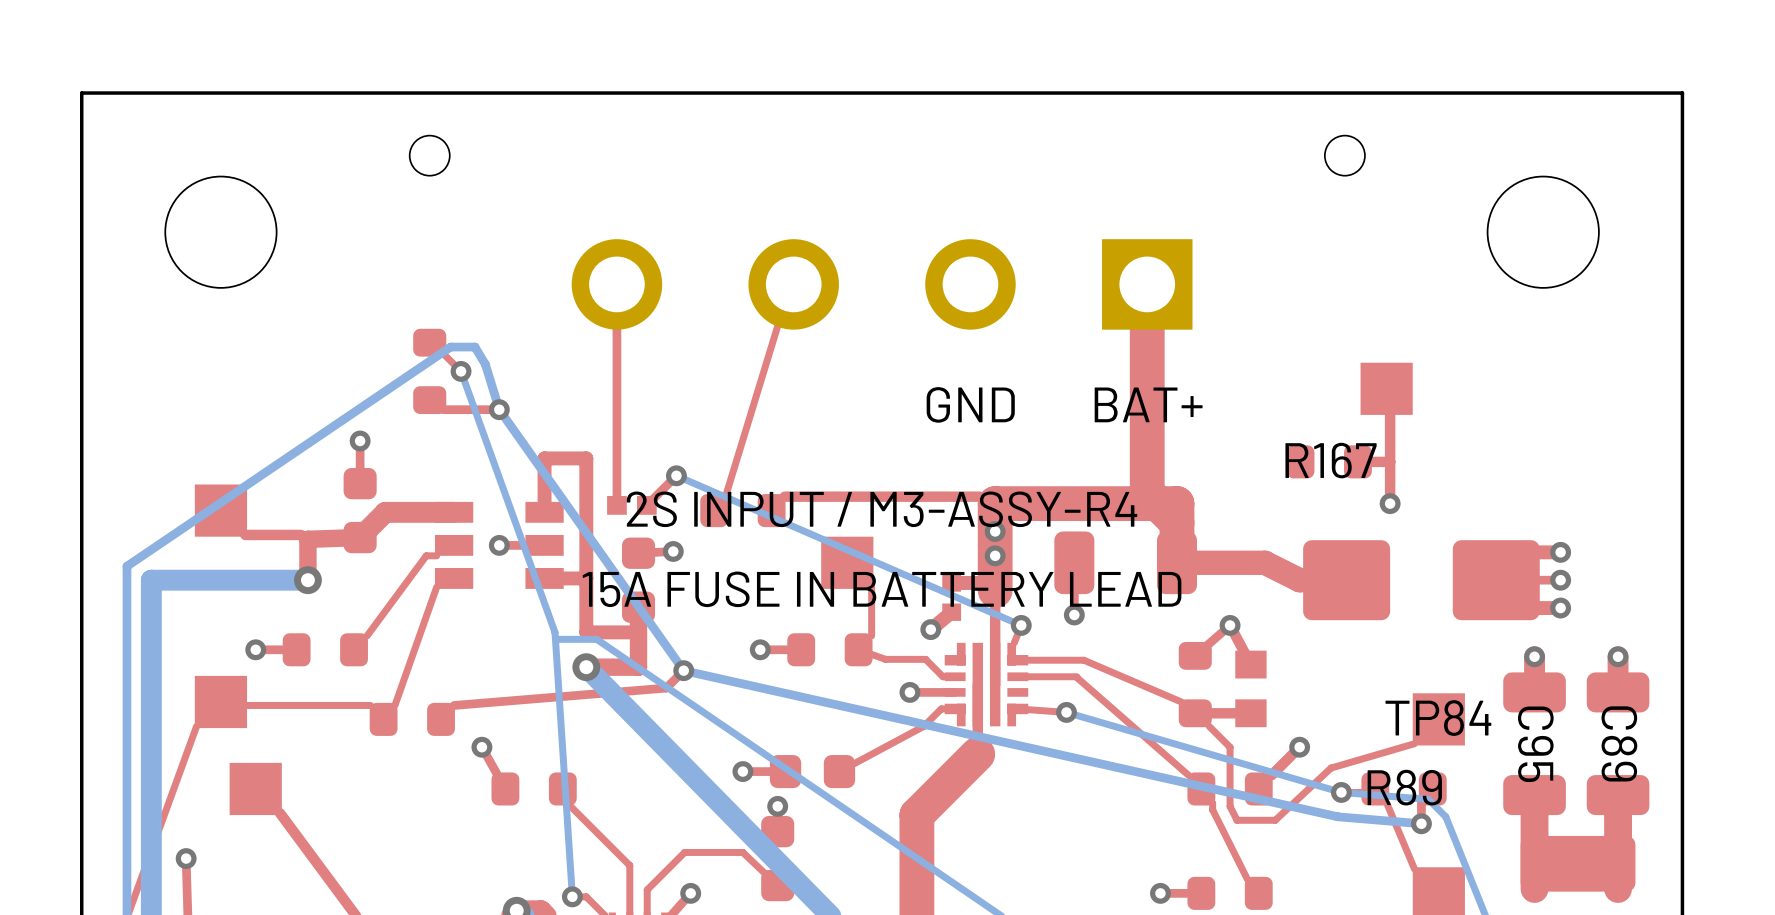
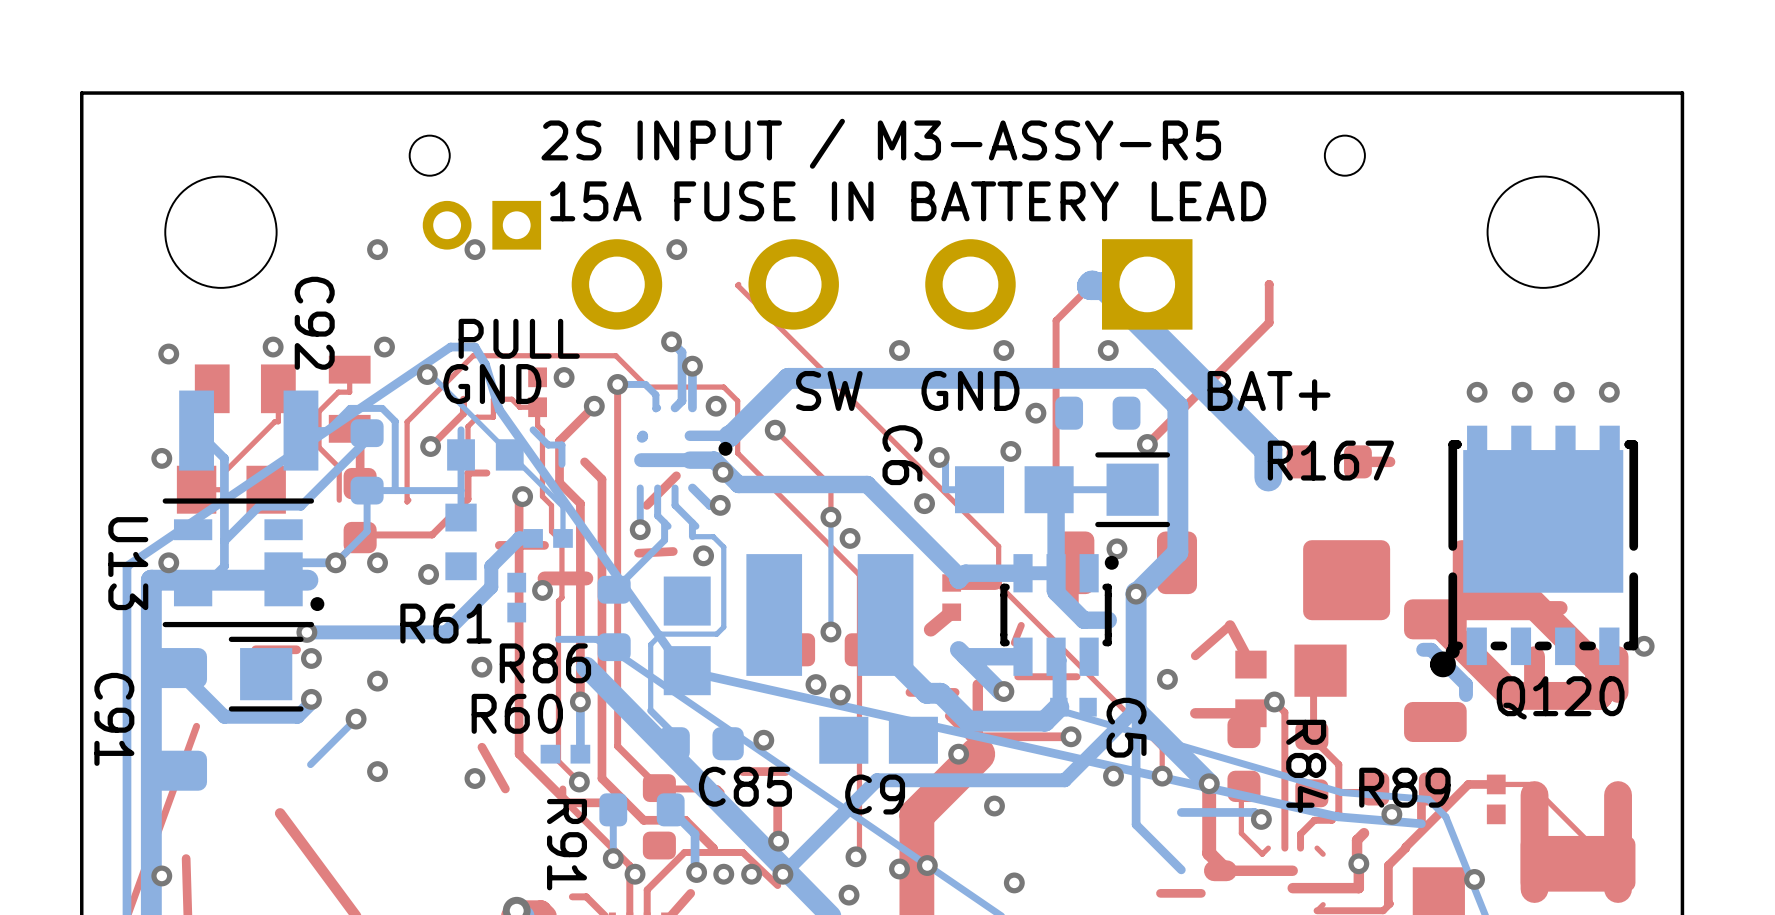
text: none -> 2S INPUT / M3-ASSY-R5 (881, 143)
part: none -> (481, 225)
via: none -> (377, 249)
via: none -> (474, 249)
via: none -> (676, 249)
top track: (616, 284) (616, 505) -> none
top track: none -> (738, 284) (998, 546) (998, 584) (1162, 748) (1162, 776)
top track: none -> (1092, 284) (1056, 320) (1056, 552)
bottom track: none -> (1092, 284) (1090, 286) (1104, 286) (1268, 449) (1268, 477)
top track: (1147, 284) (1147, 493) (1177, 522) -> none
top track: none -> (1269, 284) (1269, 322) (1147, 444)
top track: (777, 326) (725, 496) -> none
text: none -> PULL (519, 338)
bottom track: none -> (671, 341) (682, 352) (682, 400) (675, 407)
via: none -> (671, 341)
via: none -> (273, 347)
via: none -> (384, 347)
via: none -> (899, 350)
via: none -> (1003, 350)
via: none -> (1108, 350)
via: none -> (168, 354)
top track: (443, 354) (461, 371) -> none
bottom track: none -> (692, 366) (692, 407)
via: none -> (692, 366)
top track: none -> (349, 369) (349, 392) (338, 392) (319, 411) (319, 447) (339, 467) (339, 500)
R91 side: top (429, 371) -> bottom (641, 809)
bottom track: (461, 371) (554, 632) (572, 896) -> none
via position: (461, 371) -> (427, 374)
bottom track: none -> (427, 374) (430, 374) (563, 506) (563, 538)
via: none -> (564, 377)
text: none -> GND (492, 384)
top track: none -> (617, 384) (617, 746) (658, 788) (717, 788) (721, 792)
bottom track: none -> (617, 384) (645, 384) (655, 394) (655, 408) (657, 407)
via: none -> (617, 384)
part: none -> (245, 388)
top track: none -> (278, 388) (278, 421) (274, 421) (224, 471) (224, 489) (196, 489)
part: (1386, 388) -> none
text: none -> SW (829, 390)
via: none -> (1477, 392)
via: none -> (1522, 392)
via: none -> (1564, 392)
via: none -> (1609, 392)
part: none -> (349, 399)
top track: none -> (463, 399) (463, 413) (430, 446)
text position: GND (970, 404) -> GND (970, 390)
text position: BAT+ (1148, 404) -> BAT+ (1269, 390)
top track: none -> (594, 406) (559, 441) (559, 482) (580, 503) (580, 701)
via: none -> (594, 406)
via: none -> (716, 406)
top track: none -> (519, 407) (511, 399) (493, 399) (493, 417) (477, 417) (468, 426) (468, 443)
top track: none -> (519, 407) (537, 407) (537, 425) (542, 430) (542, 496) (551, 505) (551, 531) (561, 541) (561, 597) (558, 601) (558, 761) (579, 782)
top track: (499, 409) (443, 409) -> none
via: (499, 409) -> none
via: none -> (1035, 413)
top track: (1390, 413) (1390, 503) -> none
bottom track: none -> (461, 429) (461, 517)
bottom track: none -> (533, 429) (548, 445) (561, 445) (561, 464)
bottom track: none -> (196, 430) (224, 458) (224, 566) (193, 597)
C92: none -> (248, 430)
bottom track: none -> (300, 430) (327, 430) (349, 408) (382, 408) (395, 421) (395, 490)
top track: none -> (775, 430) (830, 485) (830, 517)
via: none -> (775, 430)
bottom track: none -> (367, 433) (367, 440) (300, 506) (259, 506) (224, 541)
bottom track: none -> (642, 435) (641, 437)
bottom track: none -> (689, 435) (729, 436) (788, 378) (1150, 378) (1177, 406) (1177, 552) (1136, 594)
via: (360, 441) -> none
drawing: none -> [718, 441, 733, 456]
via: none -> (1147, 444)
via: none -> (430, 446)
via: none -> (1010, 451)
part: none -> (485, 454)
bottom track: none -> (939, 457) (945, 463) (945, 489) (979, 489)
via: none -> (939, 457)
via: none -> (161, 458)
bottom track: none -> (714, 460) (738, 484) (867, 484) (957, 574) (958, 580) (965, 573) (1056, 573)
bottom track: none -> (714, 460) (641, 460)
part: none -> (367, 461)
top track: none -> (584, 461) (601, 479) (601, 778) (643, 820) (685, 820) (712, 849)
via: none -> (723, 472)
top track: none -> (486, 473) (468, 473) (468, 499) (432, 534) (363, 534) (335, 562)
bottom track: (676, 475) (1021, 625) -> none
via: (676, 475) -> none
part footprint: [194, 484, 248, 537] -> [176, 465, 286, 514]
bottom track: none -> (640, 487) (640, 529)
bottom track: none -> (657, 487) (657, 515) (668, 526)
bottom track: none -> (675, 487) (675, 505) (695, 526)
bottom track: none -> (692, 487) (709, 505) (720, 505)
C6: none -> (1014, 489)
bottom track: none -> (1132, 489) (1049, 489) (1056, 496) (1056, 592) (1083, 620) (1108, 620)
part: none -> (1132, 489)
bottom track: none -> (461, 490) (367, 490) (367, 531) (335, 562) (283, 562)
top track: none -> (522, 496) (519, 500) (519, 754) (567, 802) (624, 801)
via: none -> (522, 496)
top track: (979, 496) (784, 496) -> none
top track: none -> (408, 500) (407, 501) (407, 421) (473, 355) (615, 355) (647, 387) (723, 387) (737, 400) (737, 453) (859, 574) (859, 853) (855, 856)
via: none -> (924, 503)
via: (1390, 503) -> none
part rotation: 0° (631, 505) -> 90° clockwise (537, 392)
part position: (631, 505) -> (537, 392)
via: none -> (720, 505)
text: 2S INPUT / M3-ASSY-R4 (881, 509) -> none
part side: top (742, 510) -> bottom (1097, 413)
top track: (454, 512) (385, 512) (360, 537) (307, 539) (307, 580) -> none
top track: (544, 512) (544, 458) (586, 458) (586, 632) (638, 632) -> none
bottom track: none -> (830, 517) (830, 632)
via: none -> (830, 517)
bottom track: none -> (664, 522) (664, 540) (614, 589)
bottom track: none -> (692, 522) (692, 536) (713, 536) (723, 547) (723, 627) (716, 634) (661, 634) (650, 644) (650, 710) (675, 735) (675, 745) (674, 743)
via: none -> (640, 529)
via: (995, 531) -> none
top track: (300, 534) (245, 534) -> none
bottom track: none -> (533, 538) (519, 538) (491, 566) (491, 587) (446, 632) (306, 632)
part: none -> (548, 538)
via: none -> (850, 538)
part: none -> (461, 541)
part: (499, 545) -> none
via: (499, 545) -> none
via: none -> (1116, 548)
top track: none -> (1477, 548) (1598, 669) (1598, 695) (1511, 695) (1435, 619)
via: (673, 551) -> none
Q120: none -> (1534, 551)
via: (1560, 552) -> none
top track: (436, 555) (426, 555) (367, 635) -> none
via: none -> (703, 555)
via: (995, 555) -> none
via: none -> (168, 562)
U13: none -> (238, 562)
via: none -> (335, 562)
via: none -> (377, 562)
part: (847, 562) -> none
via: none -> (428, 574)
via: (307, 580) -> none
part: (638, 580) -> none
top track: (1346, 580) (1299, 580) (1264, 562) (1177, 562) (1177, 503) (995, 503) (995, 684) -> none
via: (1560, 580) -> none
top track: (436, 587) (394, 705) -> none
text position: 15A FUSE IN BATTERY LEAD (881, 589) -> 15A FUSE IN BATTERY LEAD (908, 201)
via: none -> (542, 590)
bottom track: none -> (1136, 592) (1136, 710) (1209, 783)
bottom track: none -> (1136, 594) (1136, 824) (1181, 869)
bottom track: none -> (1136, 594) (1137, 595) (1137, 707) (1064, 780) (876, 780) (782, 874)
via: none -> (1136, 594)
drawing: none -> [310, 597, 325, 612]
R61: none -> (516, 597)
top track: (638, 607) (638, 667) (586, 667) -> none
via: (1560, 608) -> none
part: none -> (829, 614)
bottom track: none -> (885, 614) (884, 651) (926, 693) (940, 693) (968, 721) (1044, 721) (1059, 705) (1059, 660) (1056, 656)
part: none -> (1059, 614)
via: (1074, 614) -> none
via: (1021, 625) -> none
via: (1230, 625) -> none
via: (930, 629) -> none
via: none -> (306, 632)
via: none -> (830, 632)
part: none -> (687, 635)
via: (255, 649) -> none
part: (325, 649) -> none
via: (760, 649) -> none
top track: (858, 649) (885, 659) (925, 659) (942, 676) (955, 676) -> none
bottom track: none -> (958, 649) (1000, 691) (1003, 691)
bottom track: none -> (1423, 649) (1431, 649) (1465, 684) (1465, 695)
bottom track: none -> (1023, 656) (965, 656)
via: (1534, 656) -> none
via position: (1618, 656) -> (1644, 646)
via: none -> (311, 658)
top track: (1017, 660) (1083, 660) (1181, 701) -> none
via: none -> (481, 667)
via: (586, 667) -> none
bottom track: none -> (175, 668) (224, 716) (297, 716) (311, 702) (311, 699)
top track: (683, 670) (666, 688) (454, 705) -> none
via: (683, 670) -> none
top track: none -> (1320, 670) (1313, 677) (1313, 736) (1310, 736) (1338, 764) (1338, 813) (1331, 820) (1314, 820) (1300, 834) (1300, 848)
part: none -> (1320, 670)
part: none -> (1435, 670)
part: none -> (266, 674)
top track: (1076, 677) (1188, 775) -> none
via: none -> (1167, 679)
via: none -> (377, 681)
via: none -> (815, 684)
part: (986, 684) -> none
part: (1195, 684) -> none
via: none -> (1003, 691)
via: (909, 692) -> none
via: none -> (840, 695)
via: none -> (311, 699)
part: (220, 701) -> none
bottom track: none -> (580, 701) (580, 754)
via: none -> (580, 701)
via: none -> (1274, 701)
top track: none -> (1275, 701) (1284, 712) (1284, 848)
top track: (370, 705) (245, 705) -> none
C5: none -> (1073, 707)
top track: (955, 708) (941, 708) (923, 726) (839, 771) -> none
top track: (1017, 708) (1066, 712) -> none
via position: (1066, 712) -> (1071, 736)
top track: none -> (949, 715) (970, 736) (1071, 736)
C91: none -> (175, 719)
bottom track: none -> (356, 719) (310, 764)
via: none -> (356, 719)
part: (412, 719) -> none
TP84: (1438, 719) -> none
top track: (1209, 726) (1230, 747) (1230, 806) (1237, 820) (1275, 820) (1330, 768) (1414, 743) -> none
via: none -> (763, 740)
C9: none -> (878, 740)
C95: (1534, 743) -> none
C89: (1618, 743) -> none
via position: (481, 747) -> (474, 778)
top track: (1299, 747) (1271, 775) -> none
via: (1299, 747) -> none
R60: none -> (565, 754)
via: none -> (958, 754)
R84: none -> (1311, 764)
via: none -> (377, 771)
via: (742, 771) -> none
part: (812, 771) -> none
part footprint: [1187, 772, 1273, 806] -> [1227, 716, 1261, 803]
via: none -> (1113, 776)
via: none -> (1162, 776)
via: none -> (579, 782)
top track: none -> (1209, 783) (1209, 853) (1226, 870)
via: none -> (1209, 783)
part: (255, 788) -> none
R86 side: top (534, 788) -> bottom (614, 618)
top track: none -> (1244, 788) (1241, 791) (1241, 833) (1262, 854) (1268, 848)
via: (1341, 792) -> none
part: none -> (1496, 799)
top track: (1212, 802) (1212, 809) (1247, 879) -> none
top track: (1386, 802) (1414, 869) -> none
via: (777, 806) -> none
via: none -> (994, 806)
bottom track: none -> (613, 809) (613, 858)
bottom track: none -> (670, 809) (695, 834) (695, 872) (696, 872)
bottom track: none -> (1181, 812) (1254, 812) (1261, 819)
via: none -> (1391, 814)
part: none -> (659, 816)
via: none -> (1261, 819)
via: (1421, 823) -> none
top track: none -> (1364, 833) (1357, 840) (1358, 888) (1292, 888)
via: none -> (778, 841)
top track: none -> (1317, 848) (1323, 854)
top track: none -> (1598, 855) (1600, 854) (1531, 784) (1468, 784) (1388, 865) (1388, 903) (1390, 903) (1383, 910) (1317, 910) (1323, 904)
via: none -> (855, 856)
via position: (186, 858) -> (161, 875)
via: none -> (613, 858)
C85 side: top (777, 858) -> bottom (701, 743)
via: none -> (1358, 863)
via: none -> (927, 865)
via: none -> (899, 869)
top track: none -> (1226, 870) (1214, 870)
top track: none -> (1292, 870) (1226, 870)
via: none -> (635, 874)
via: none -> (723, 874)
via: none -> (751, 874)
via: none -> (782, 874)
via: none -> (1474, 879)
via: none -> (1014, 882)
via position: (690, 893) -> (696, 872)
via: (1160, 893) -> none
part: (1230, 893) -> none
via: none -> (849, 895)
via: (572, 896) -> none

